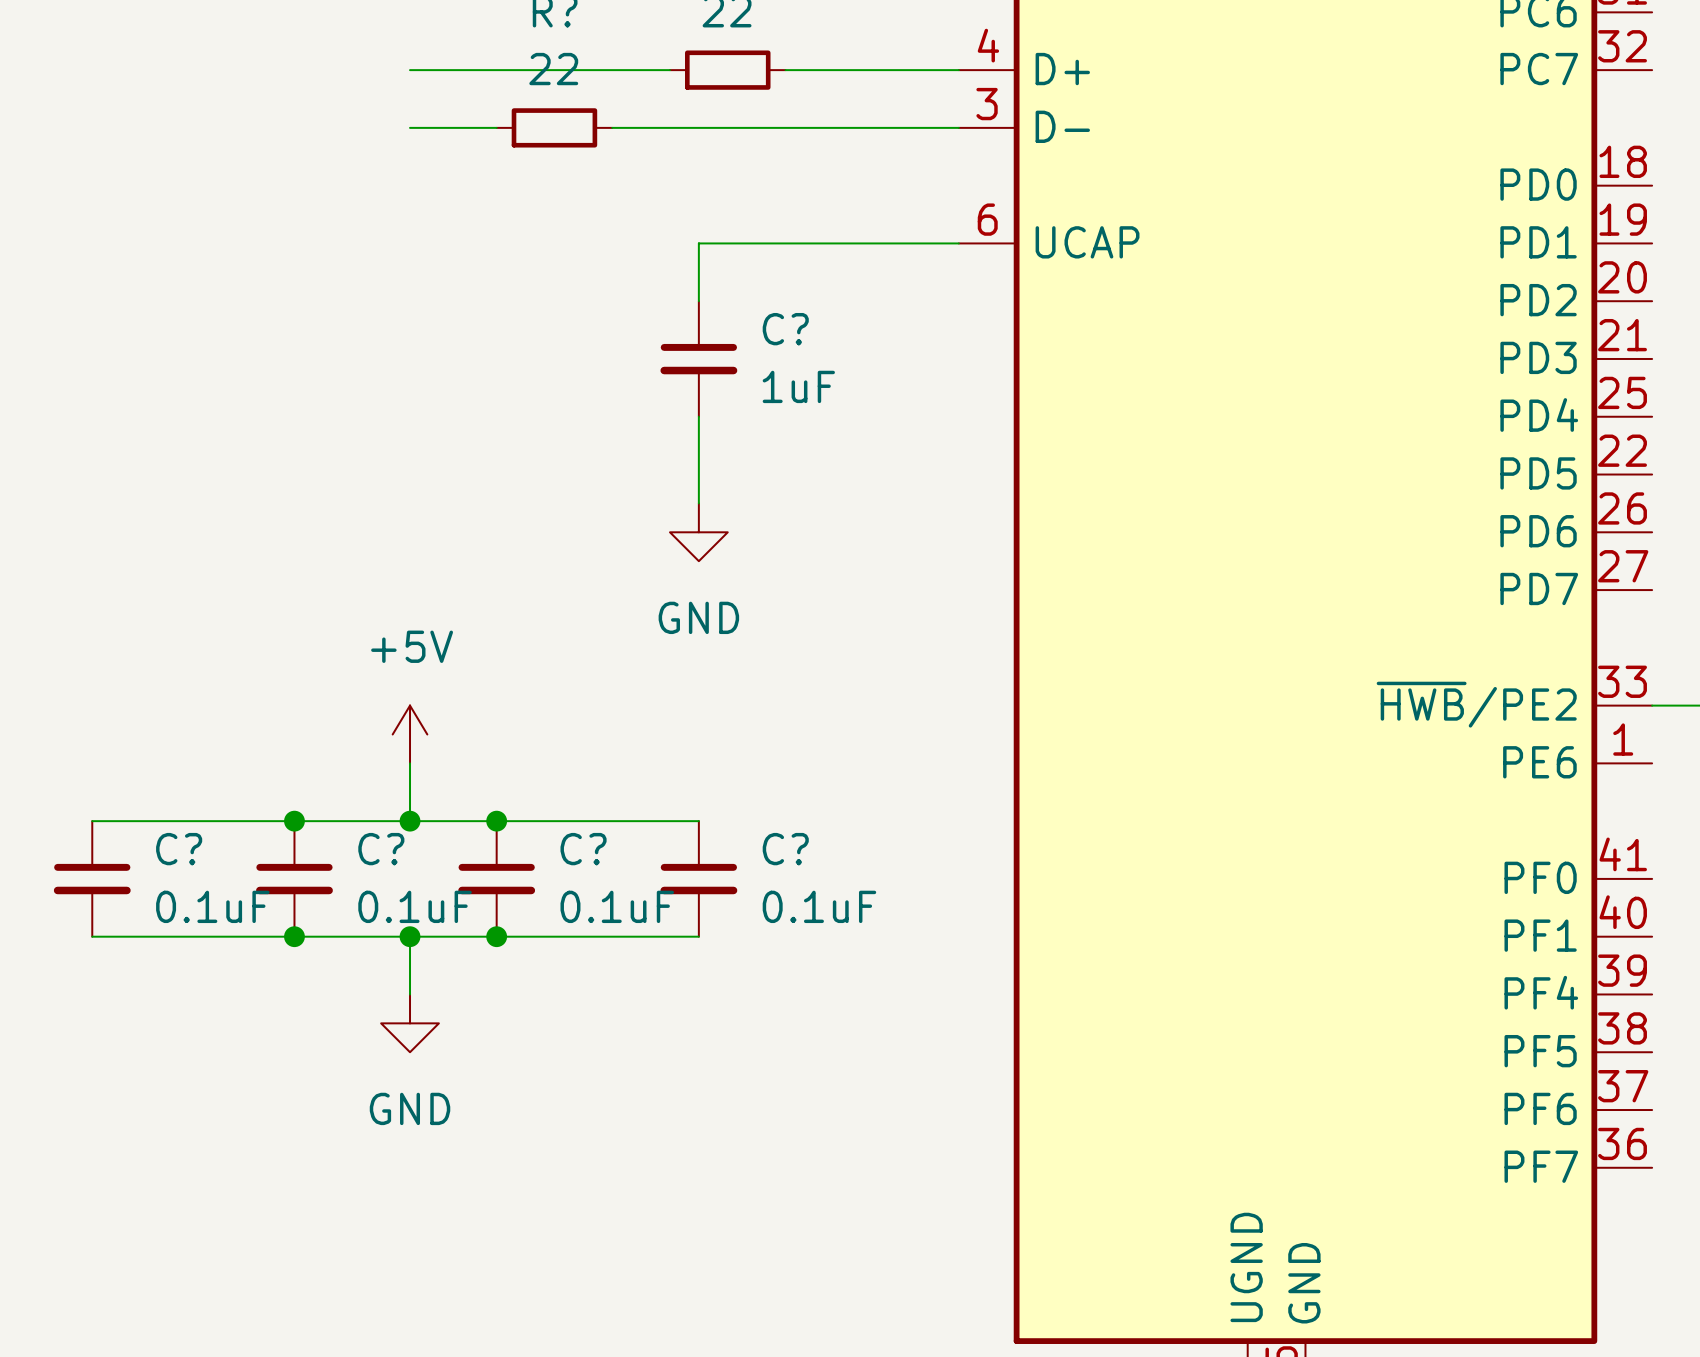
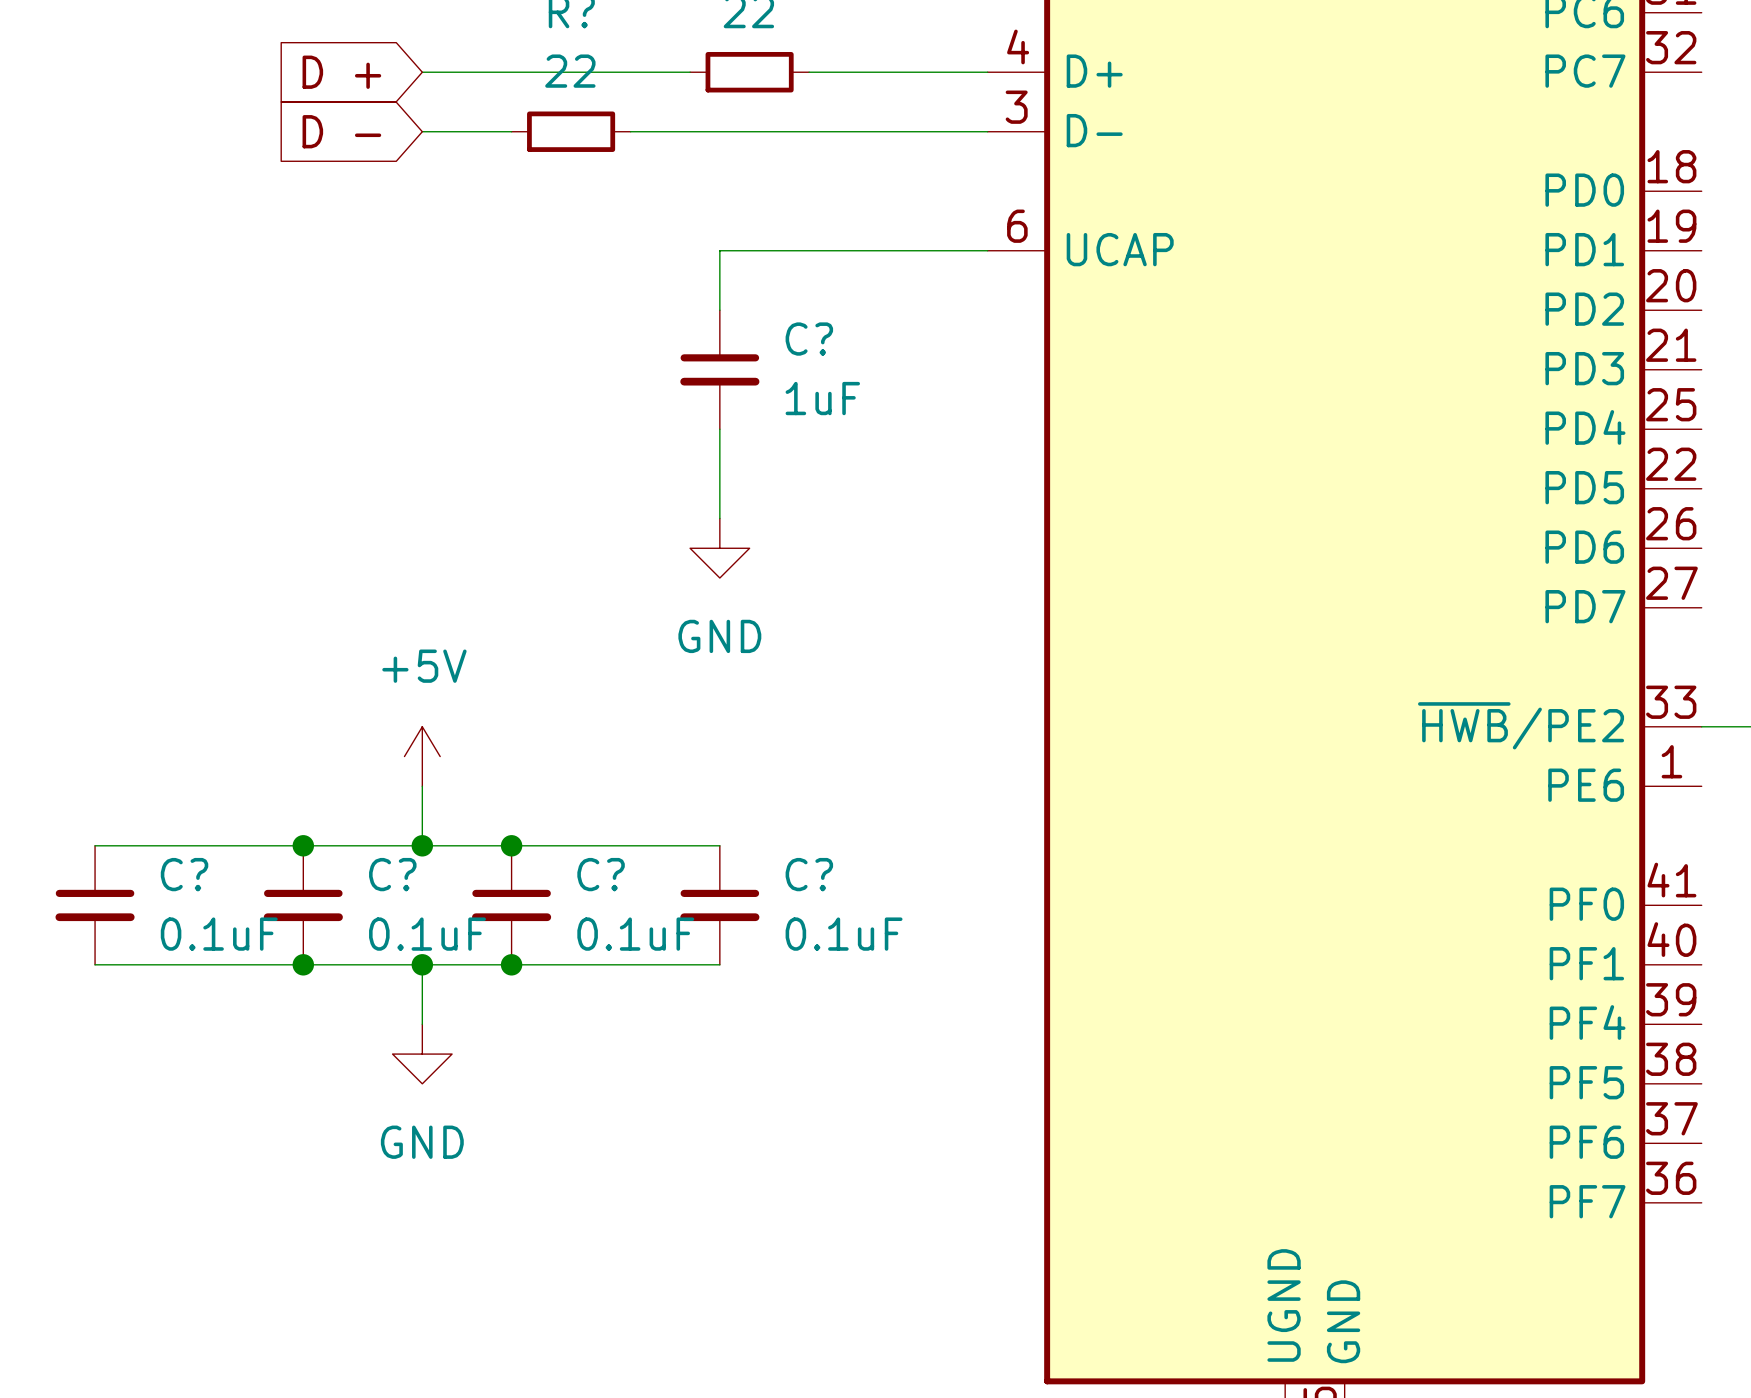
global label: none -> D + (341, 72)
global label: none -> D - (341, 131)

